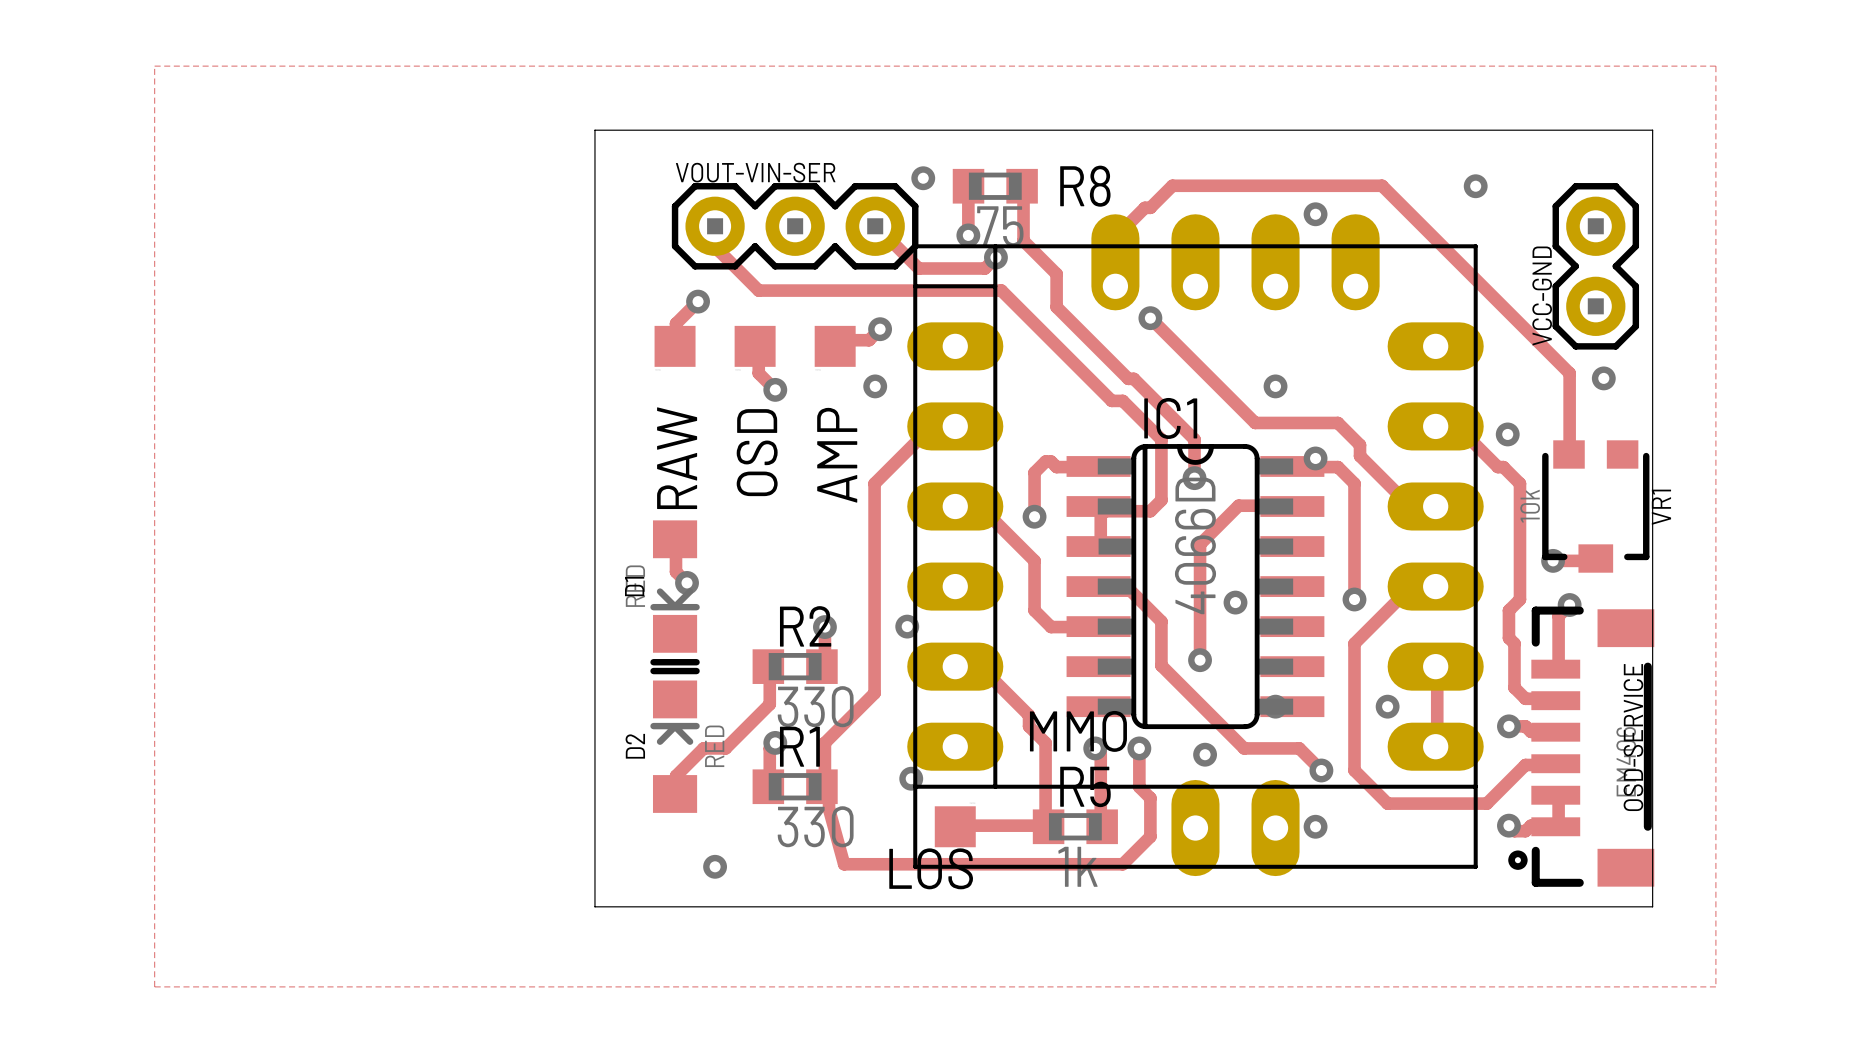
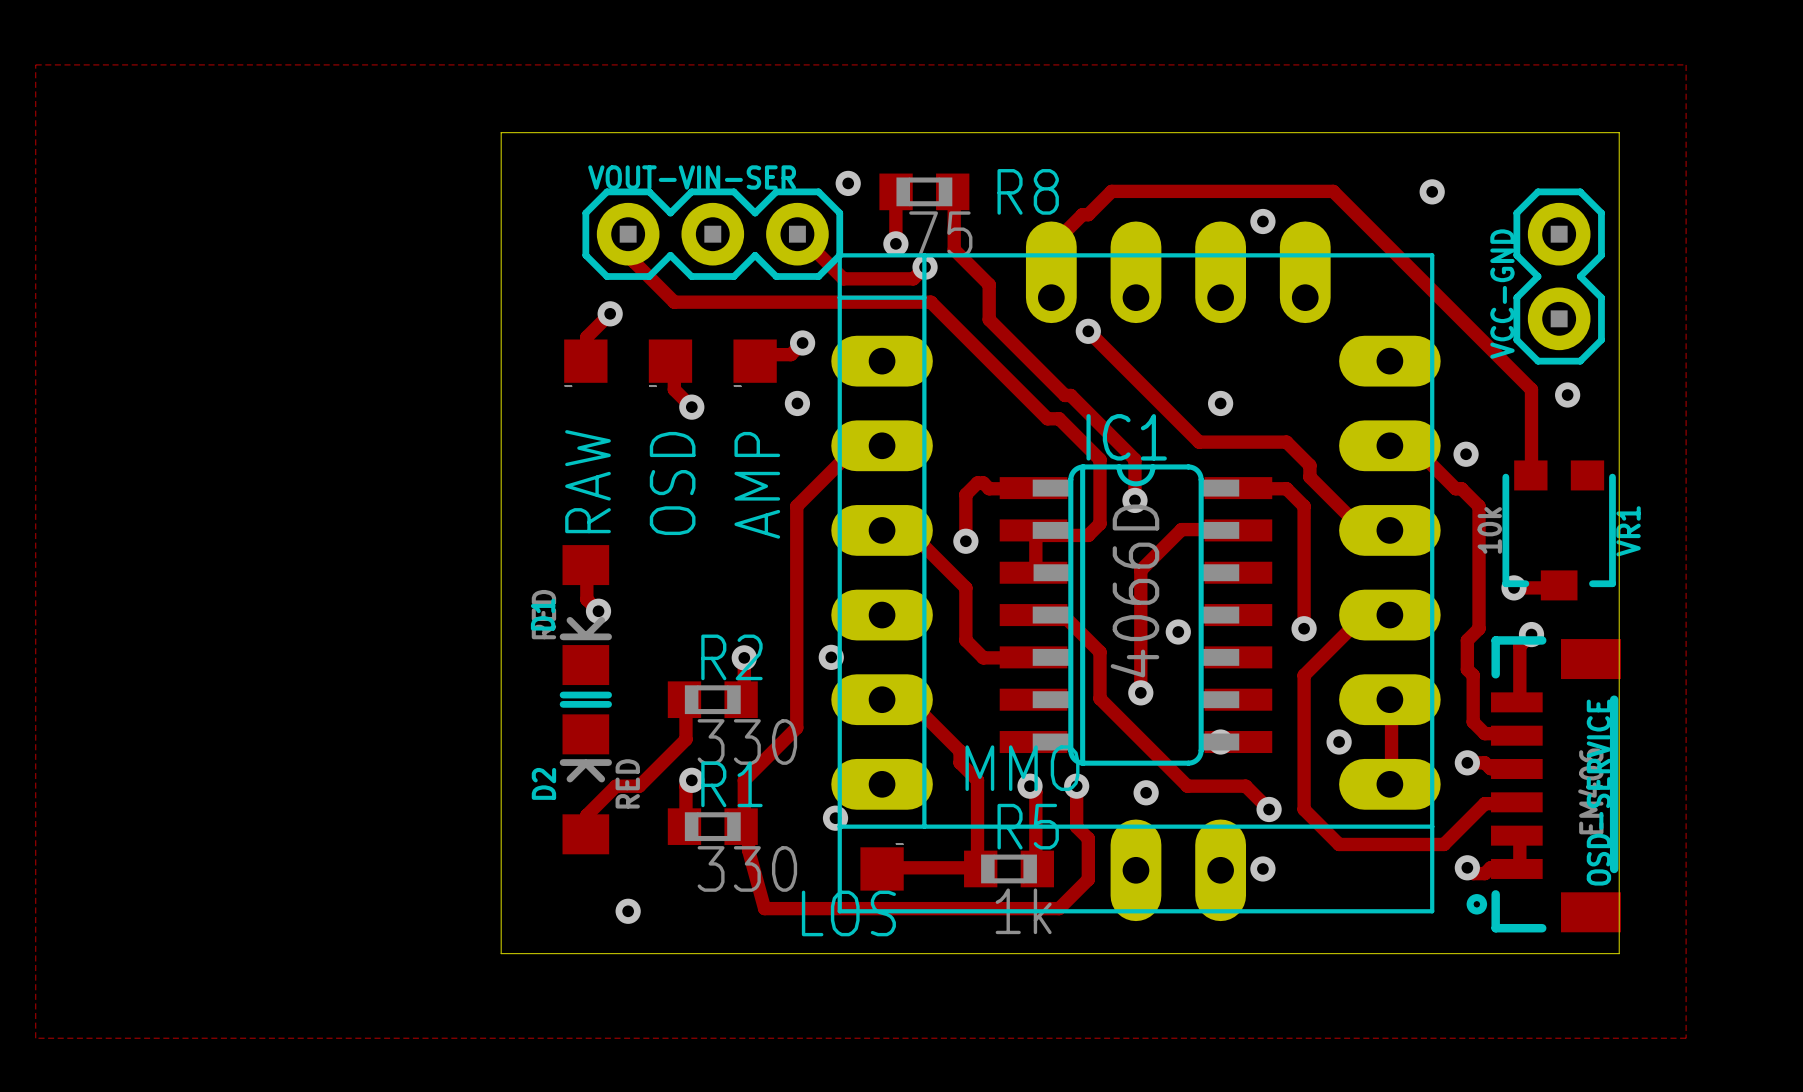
via: (1315, 458) -> none

